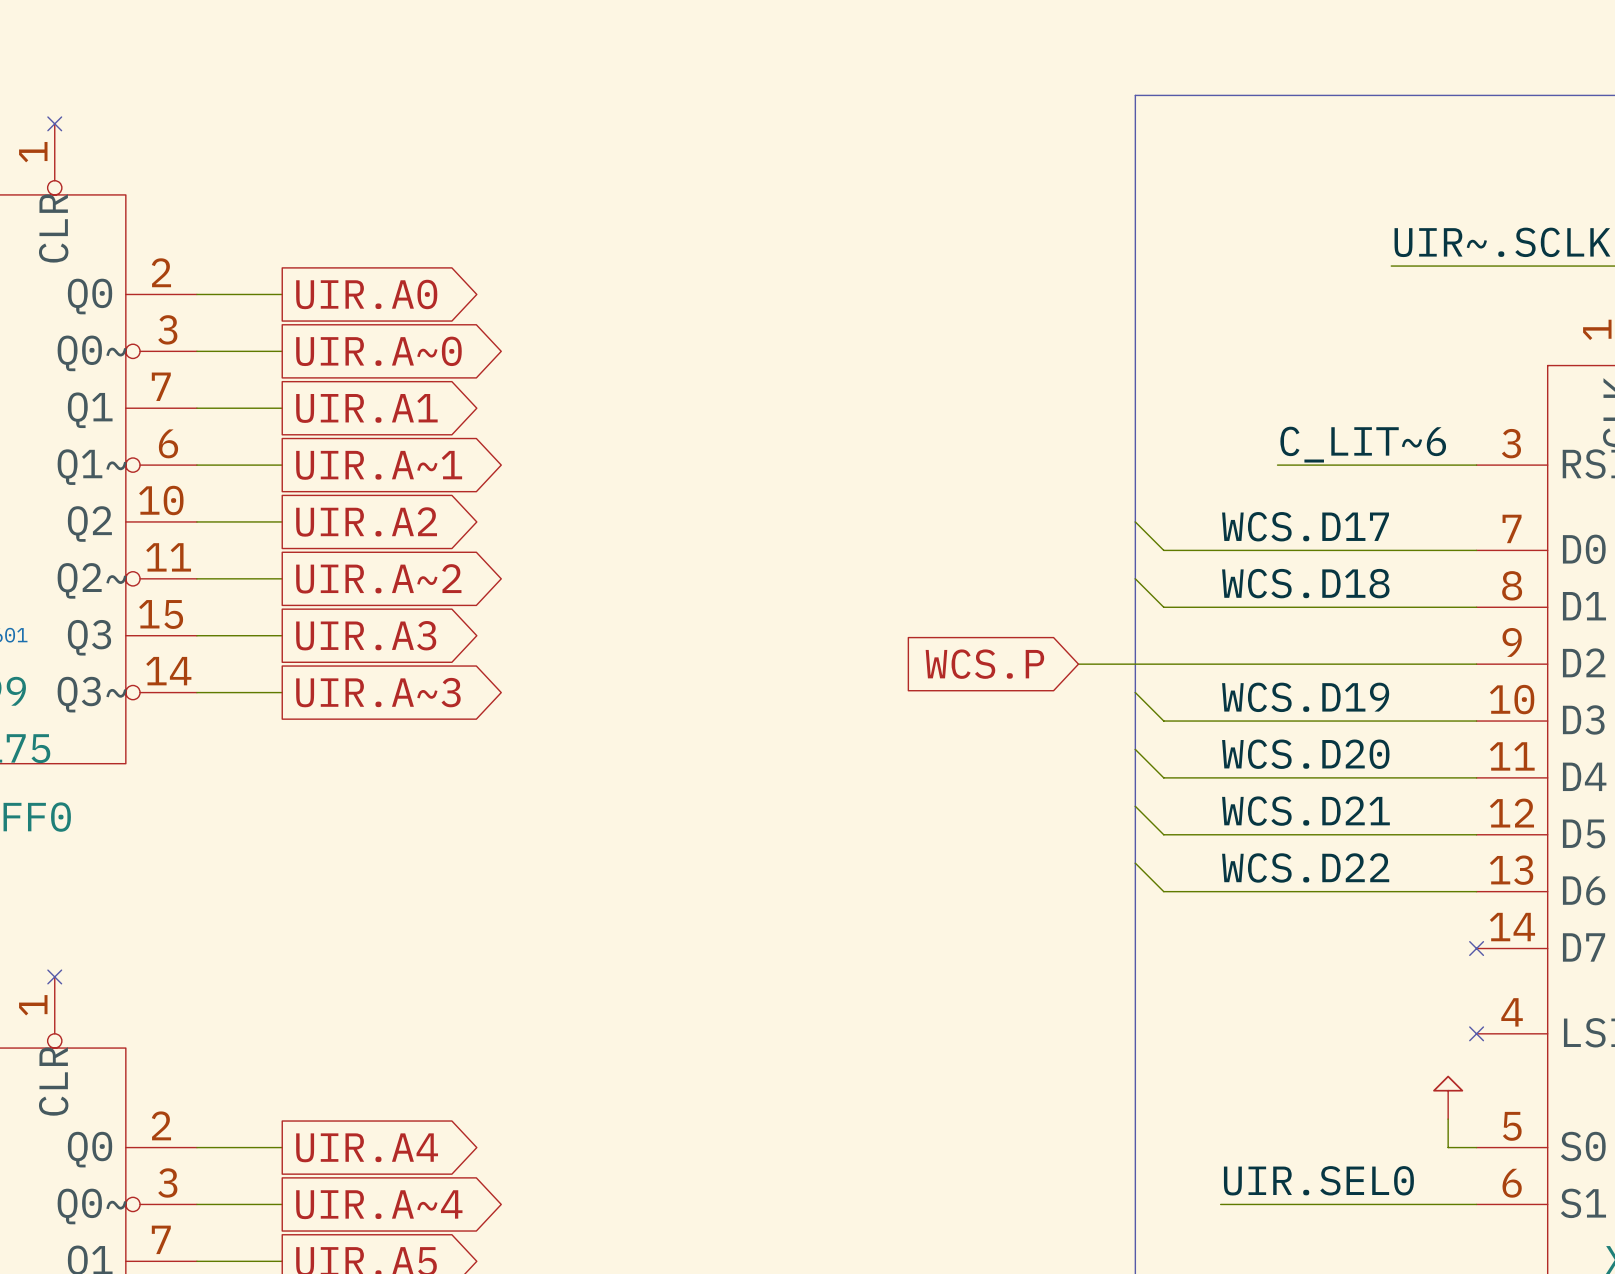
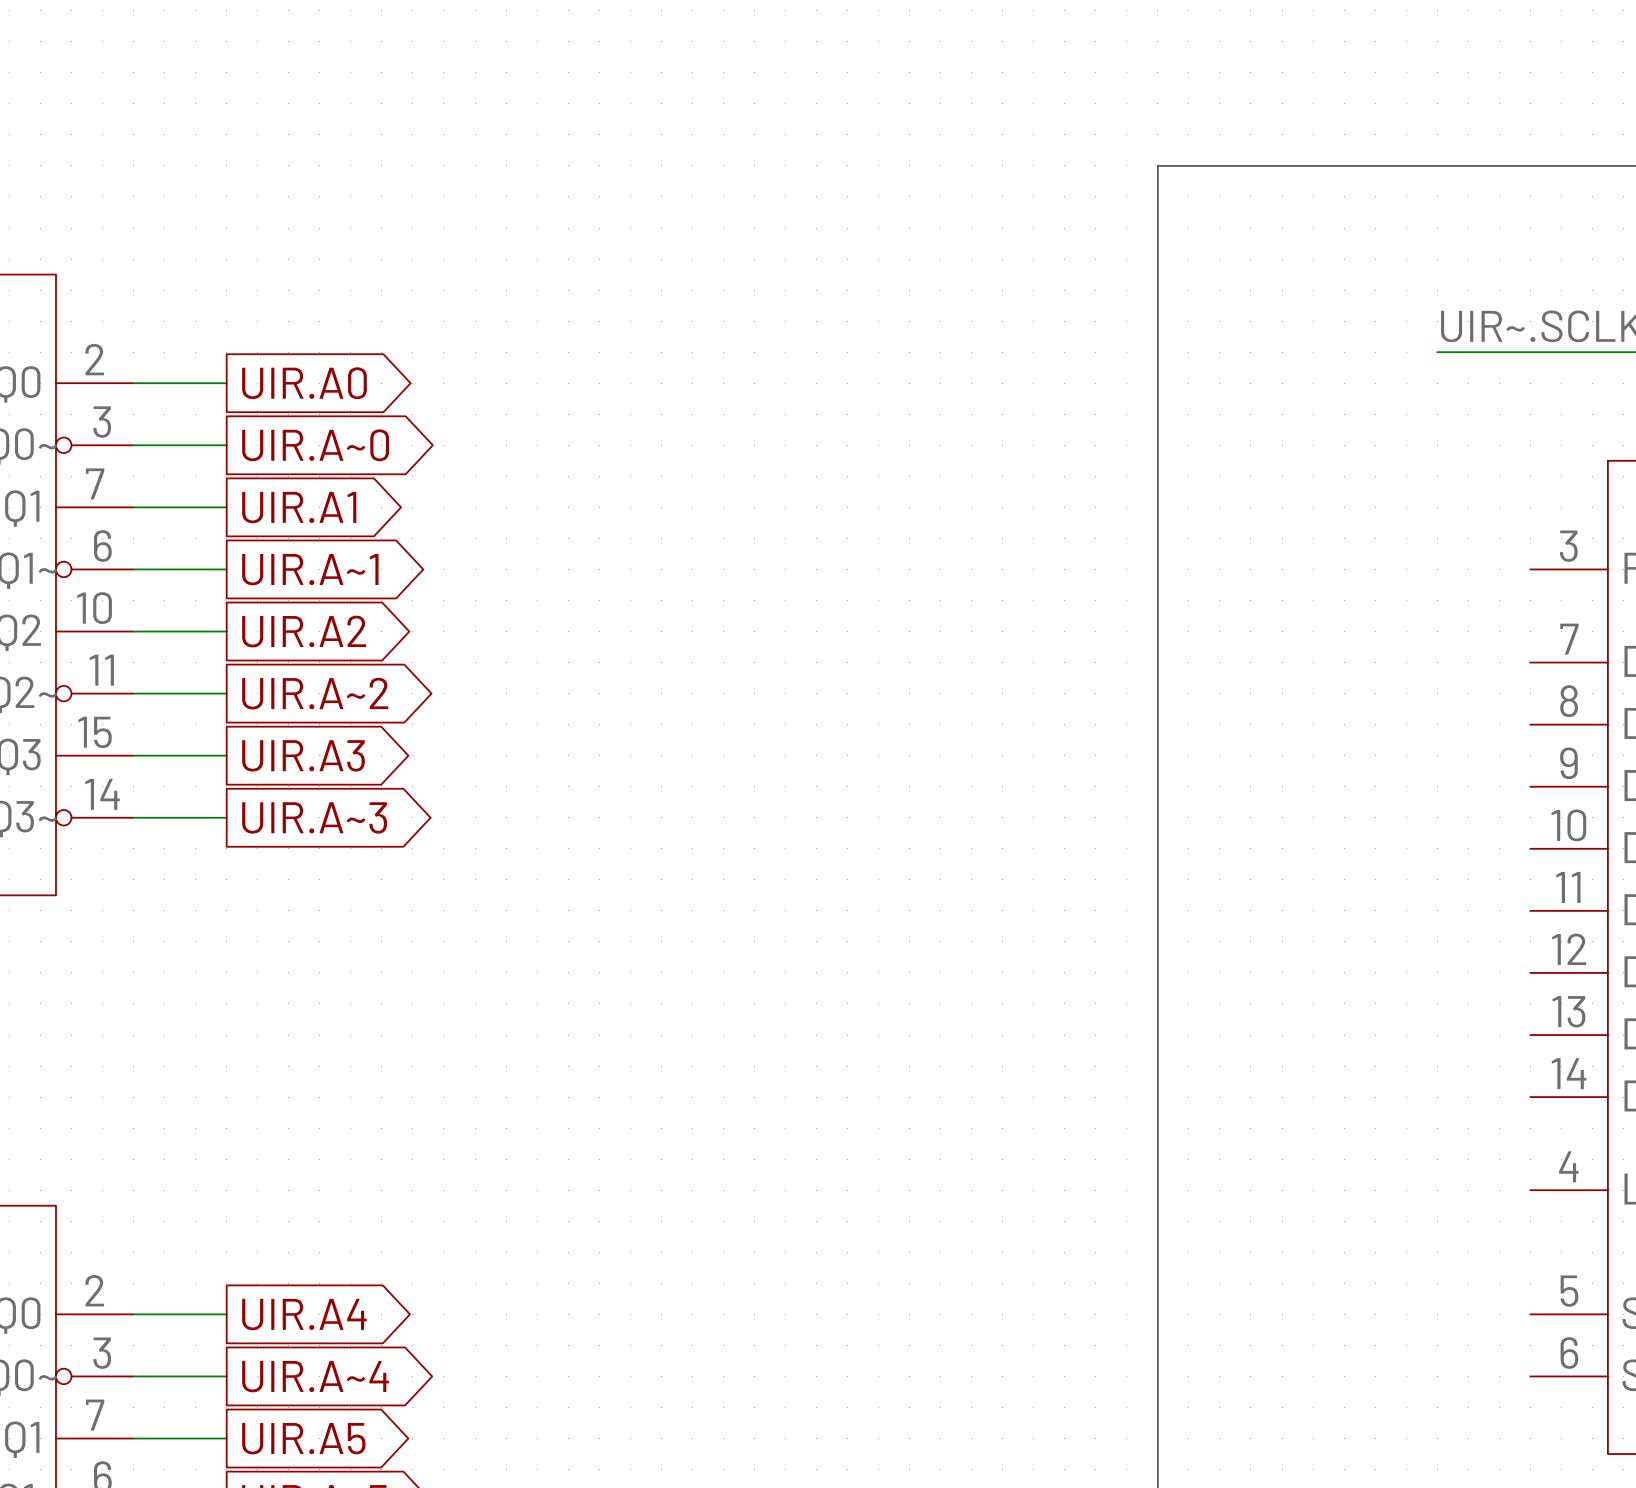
label: C_LIT~6 (1363, 444) -> none
wire: (1277, 465) (1476, 465) -> none
wire: (1135, 521) (1163, 550) (1476, 550) -> none
label: WCS.D17 (1305, 526) -> none
wire: (1135, 578) (1163, 607) (1476, 607) -> none
label: WCS.D18 (1305, 583) -> none
global label: WCS.P (984, 664) -> none
wire: (1078, 664) (1476, 664) -> none
wire: (1135, 692) (1163, 721) (1476, 721) -> none
label: WCS.D19 (1305, 697) -> none
wire: (1135, 749) (1163, 777) (1476, 777) -> none
label: WCS.D20 (1305, 754) -> none
wire: (1135, 806) (1163, 834) (1476, 834) -> none
label: WCS.D21 (1305, 811) -> none
wire: (1135, 863) (1163, 891) (1476, 891) -> none
label: WCS.D22 (1305, 867) -> none
no-connect mark: (1476, 948) -> none
no-connect mark: (1476, 1033) -> none
power symbol: (1448, 1097) -> none
wire: (1448, 1119) (1448, 1147) (1476, 1147) -> none
label: UIR.SEL0 (1318, 1180) -> none
wire: (1220, 1204) (1476, 1204) -> none

